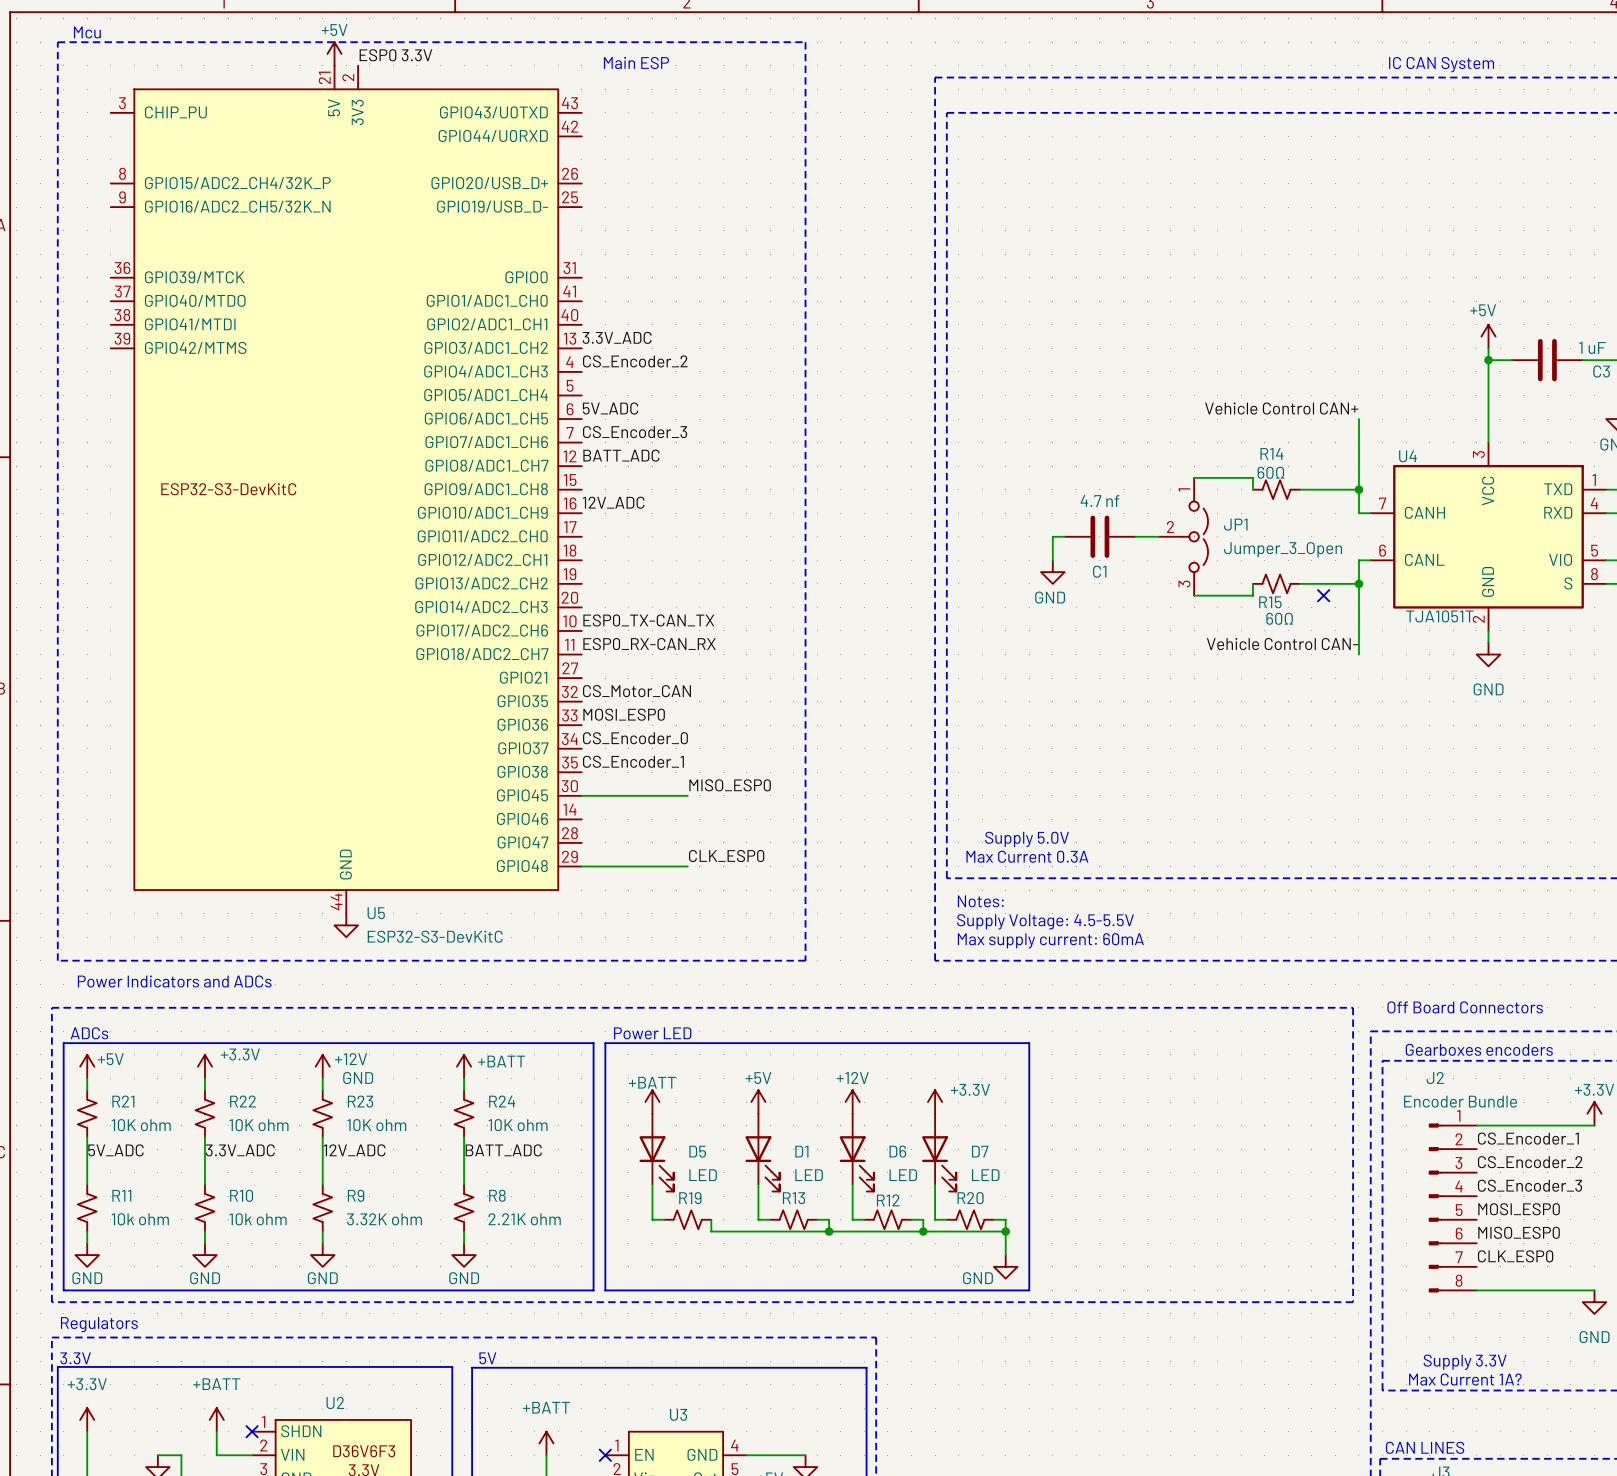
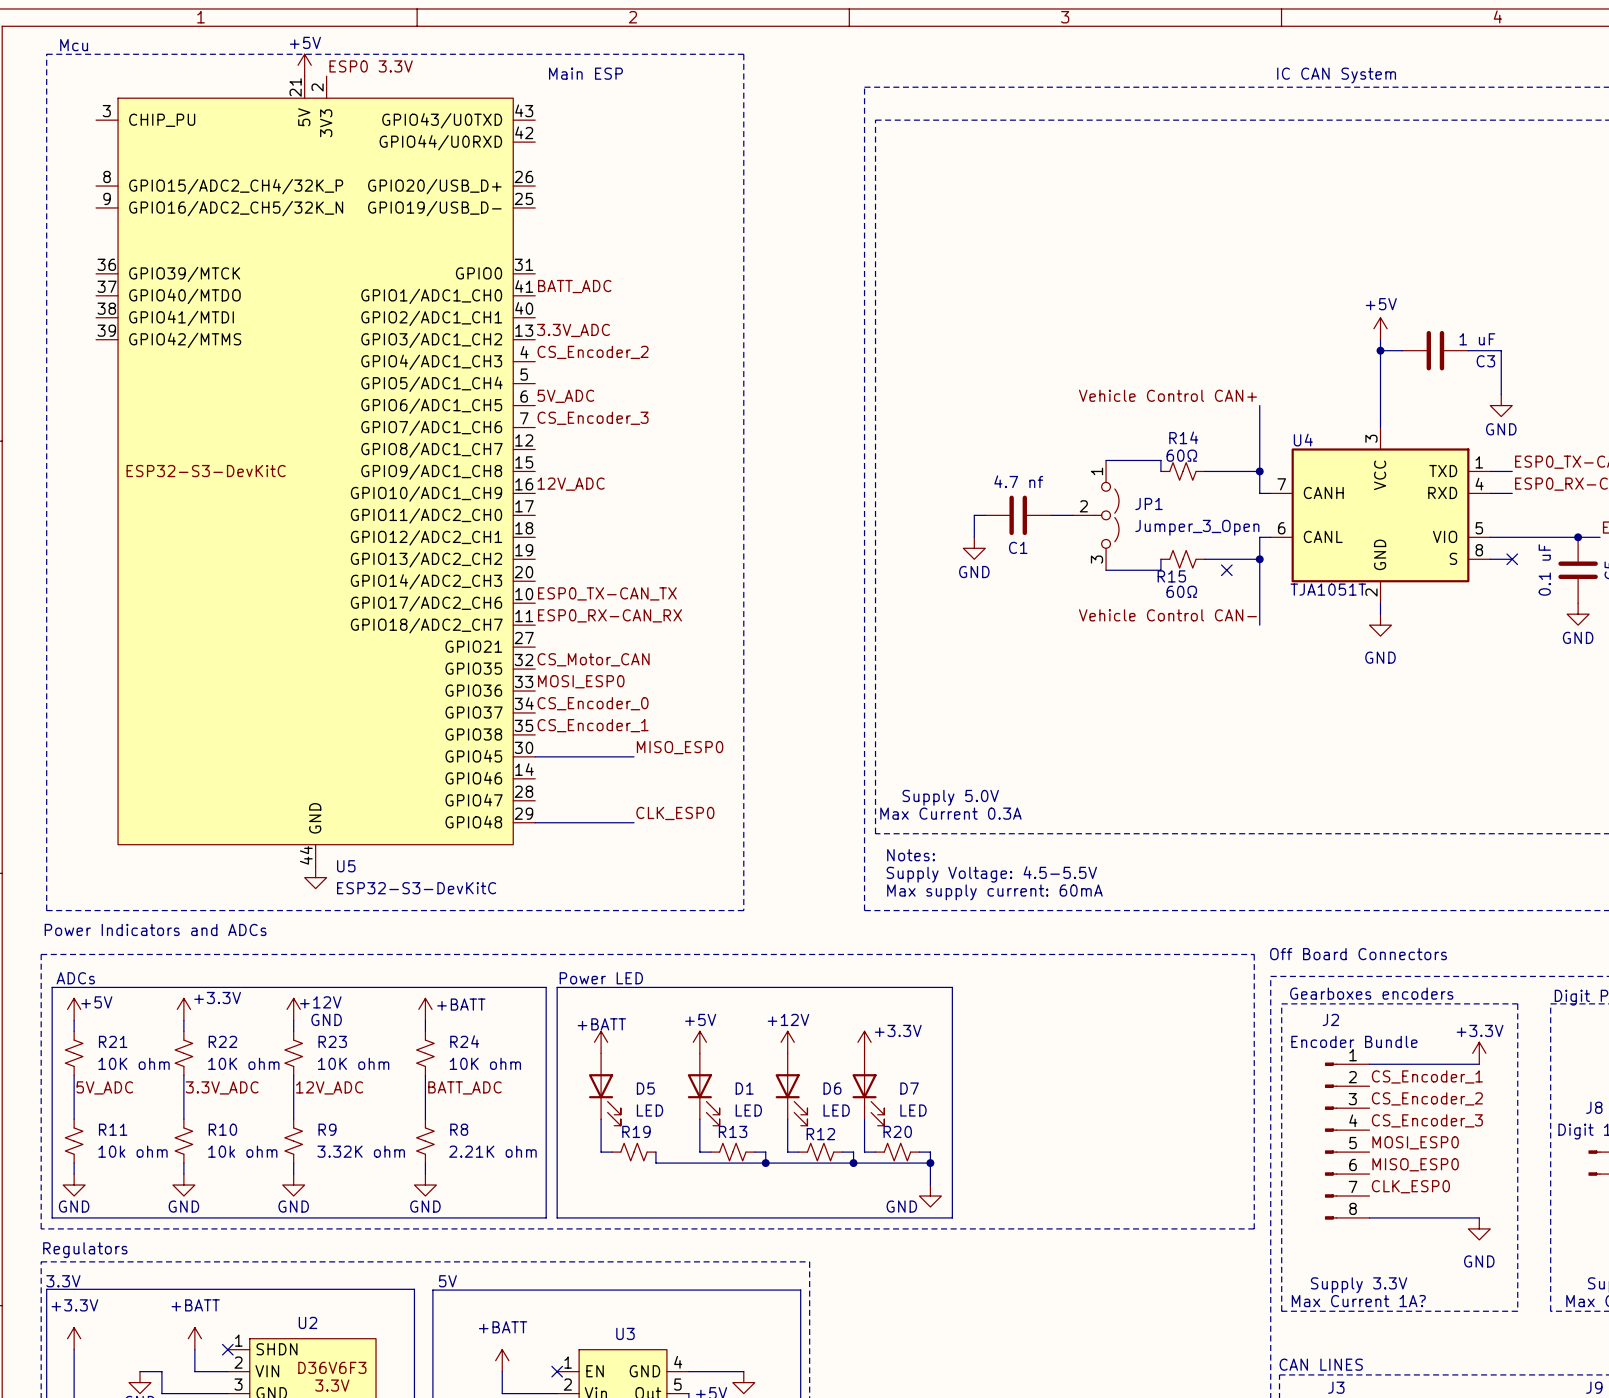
label position: BATT_ADC (621, 455) -> BATT_ADC (574, 286)

